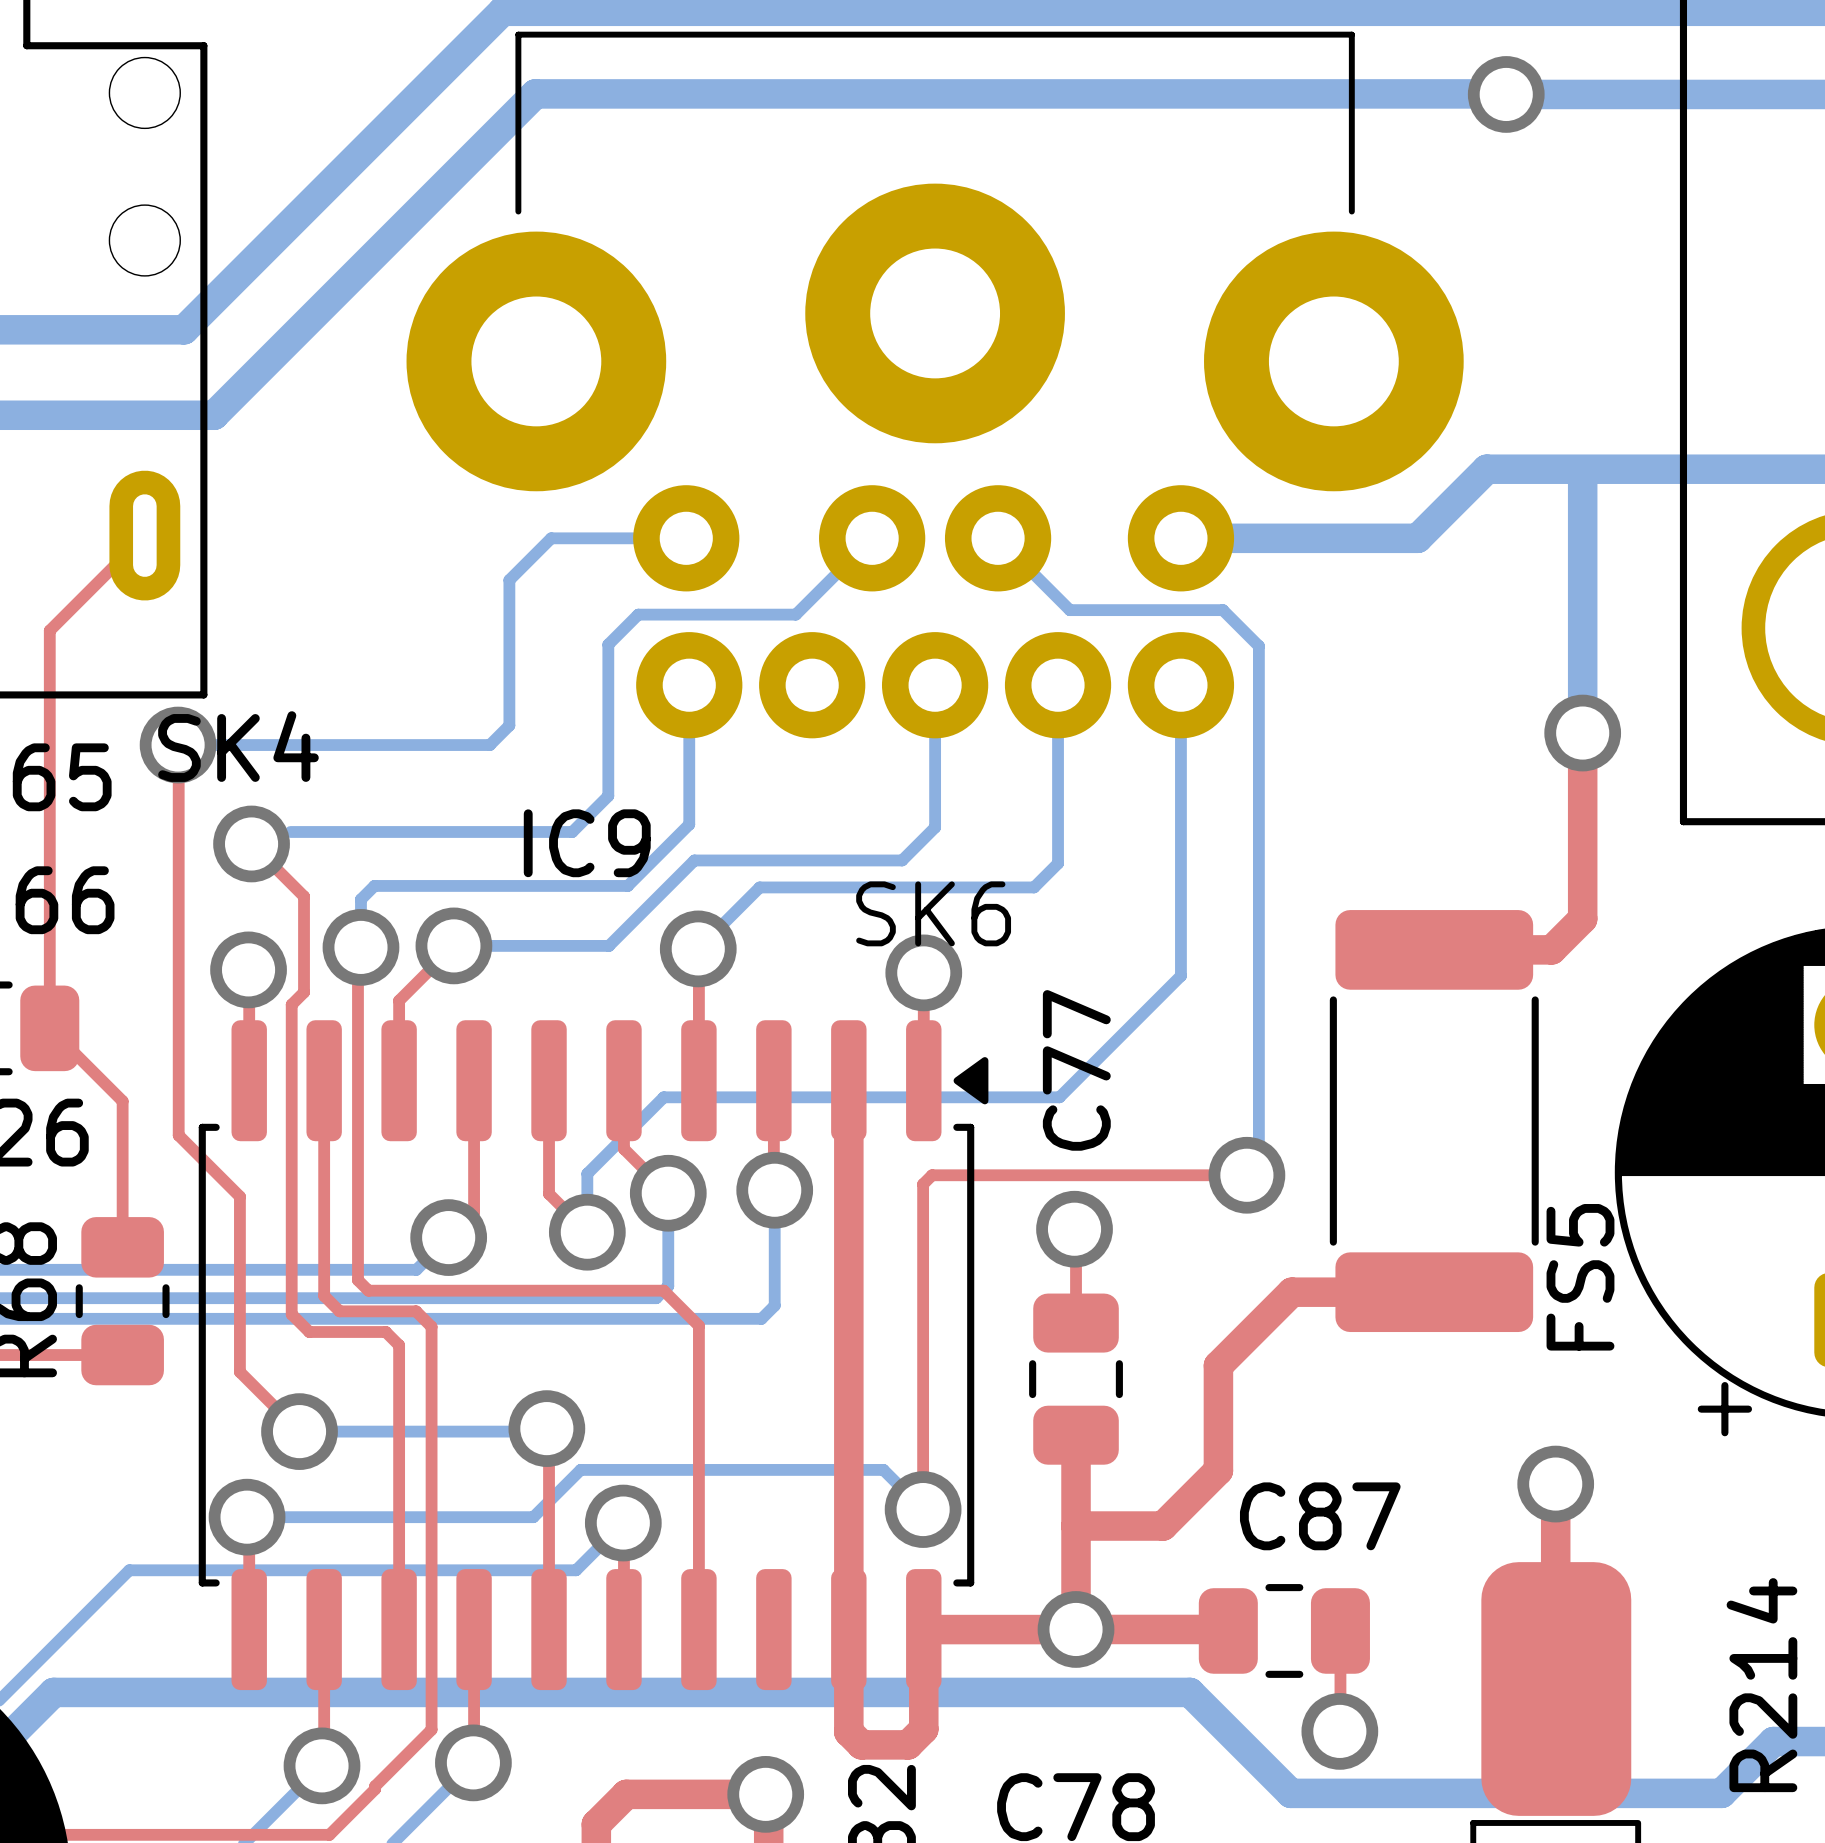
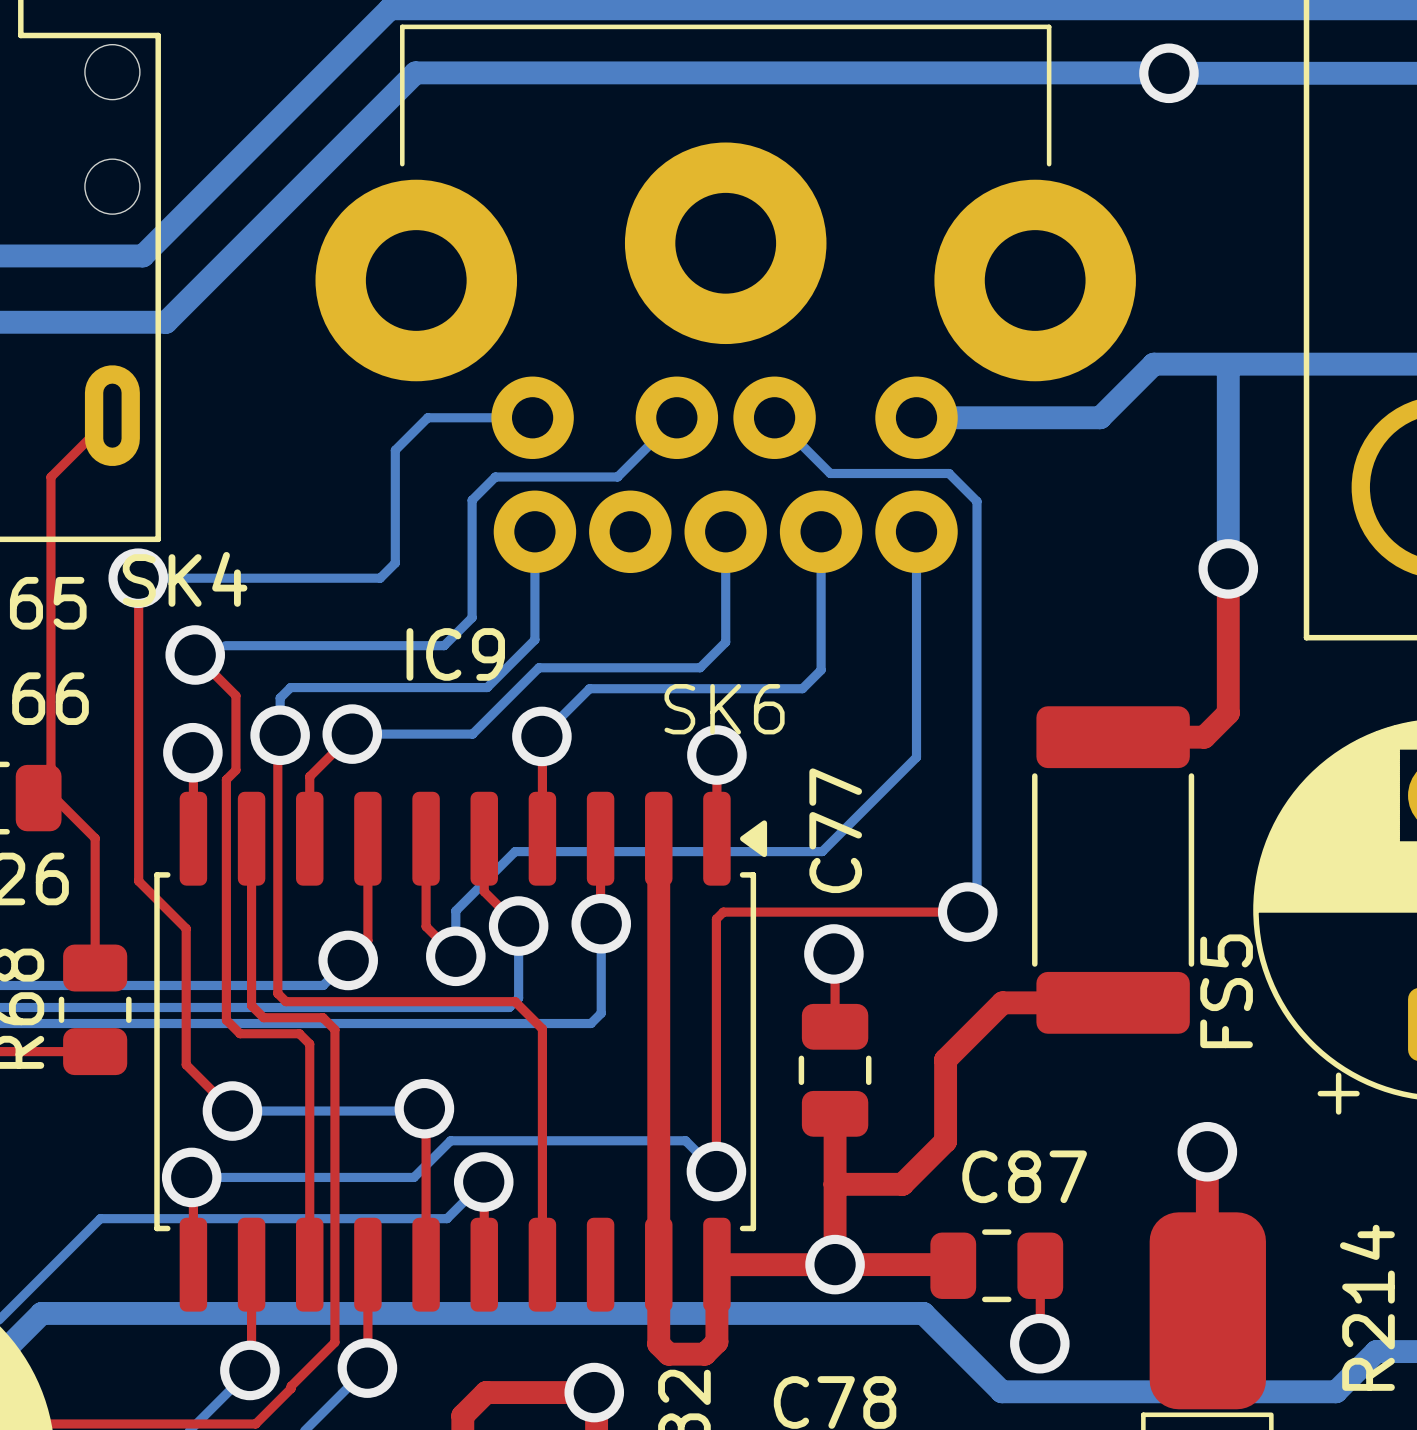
top track: (65, 614) (49, 630) (49, 1028) (122, 1101) -> (50, 477) (50, 767) (37, 780) (95, 838) (95, 854)

